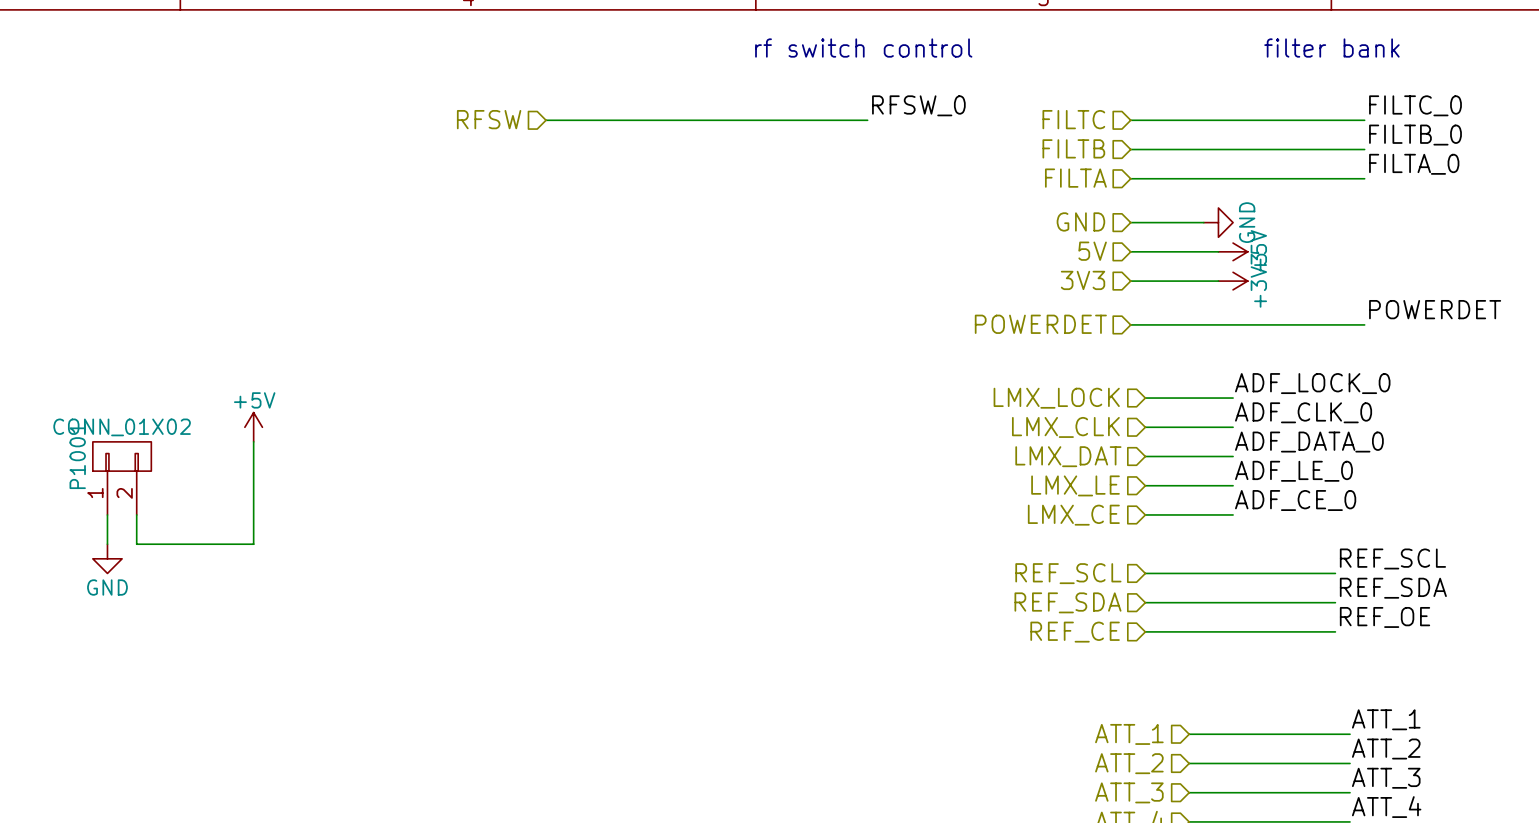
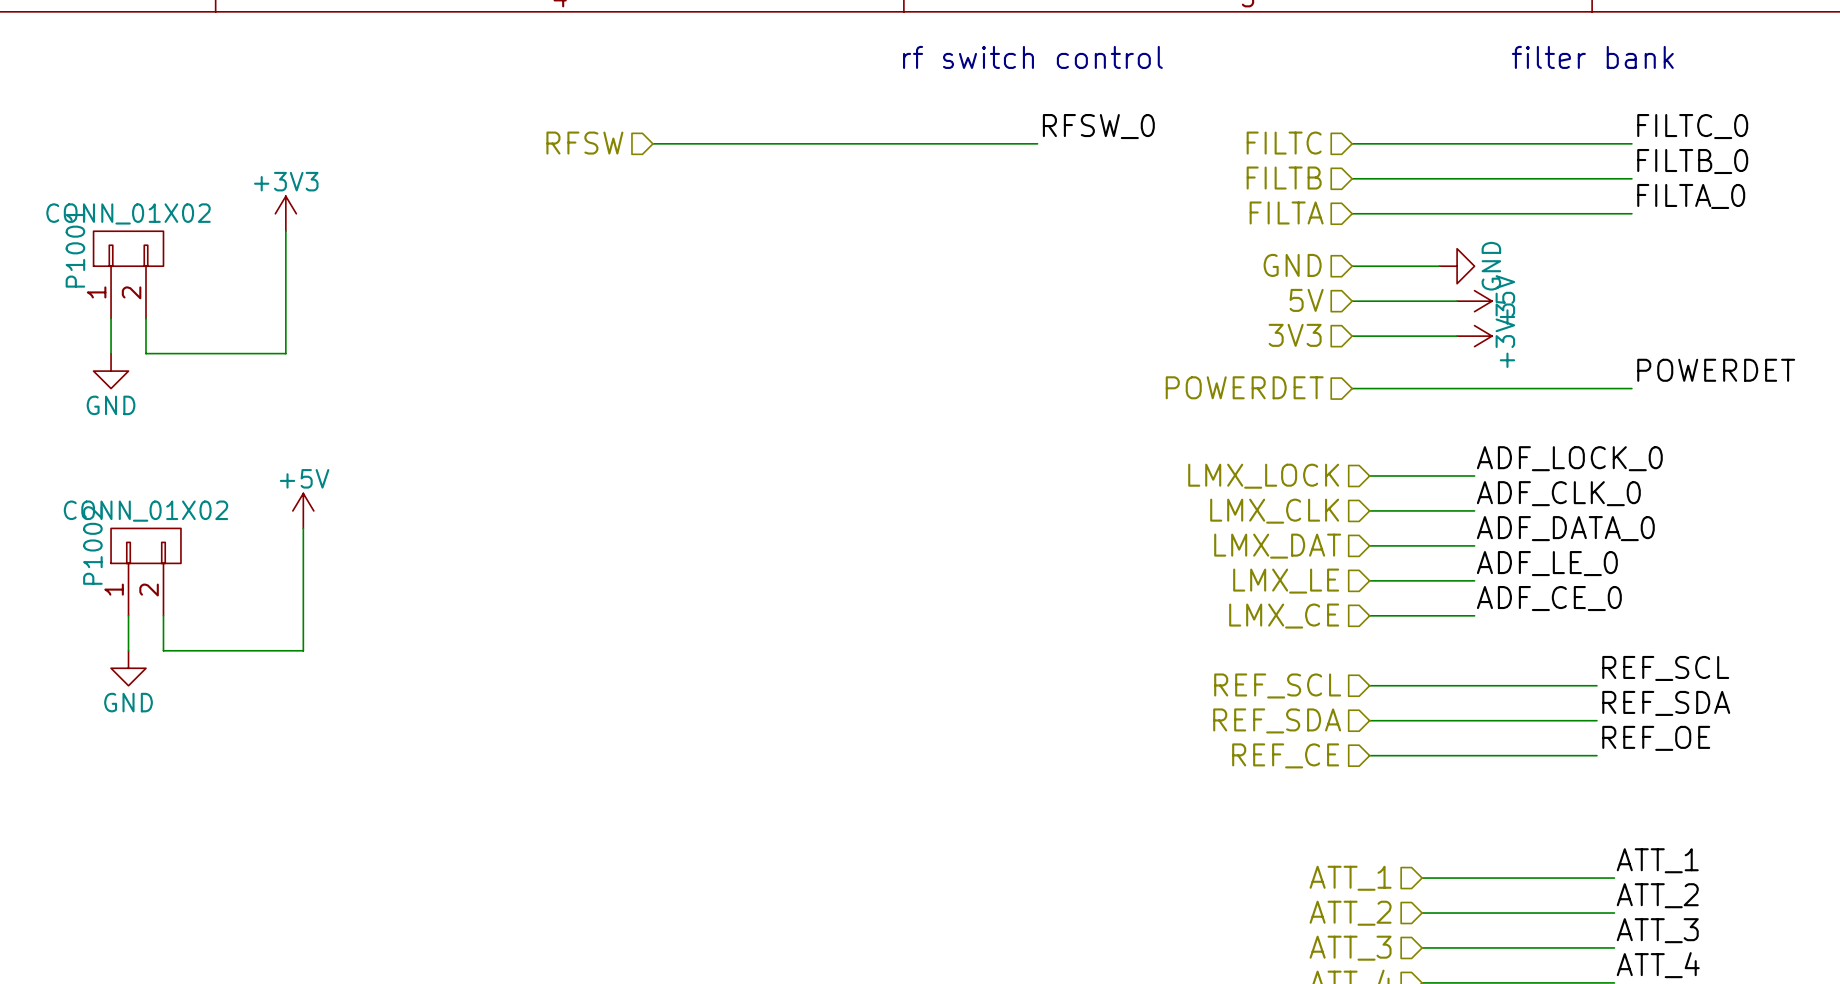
power symbol: none -> +3V3 (285, 213)
wire: none -> (285, 231) (285, 353) (146, 353) (146, 318)
P1001: none -> CONN_01X02 (128, 274)
wire: none -> (111, 318) (111, 353)
power symbol: none -> GND (111, 371)
P1001 name: P1001 (77, 456) -> P1002 (92, 545)

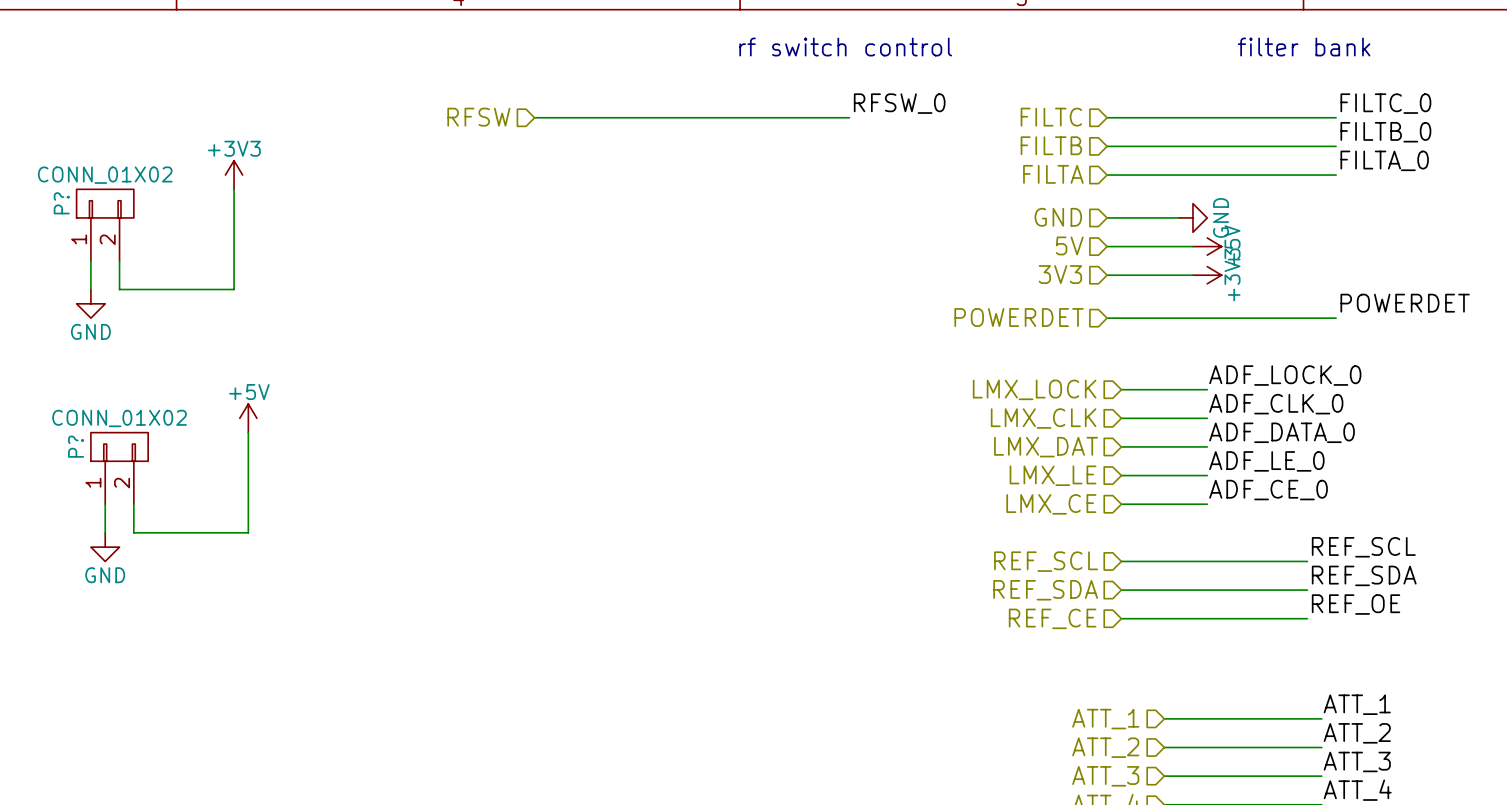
P1001 name: P1001 (75, 248) -> P? (61, 203)
P1002 name: P1002 (92, 545) -> P? (76, 446)

